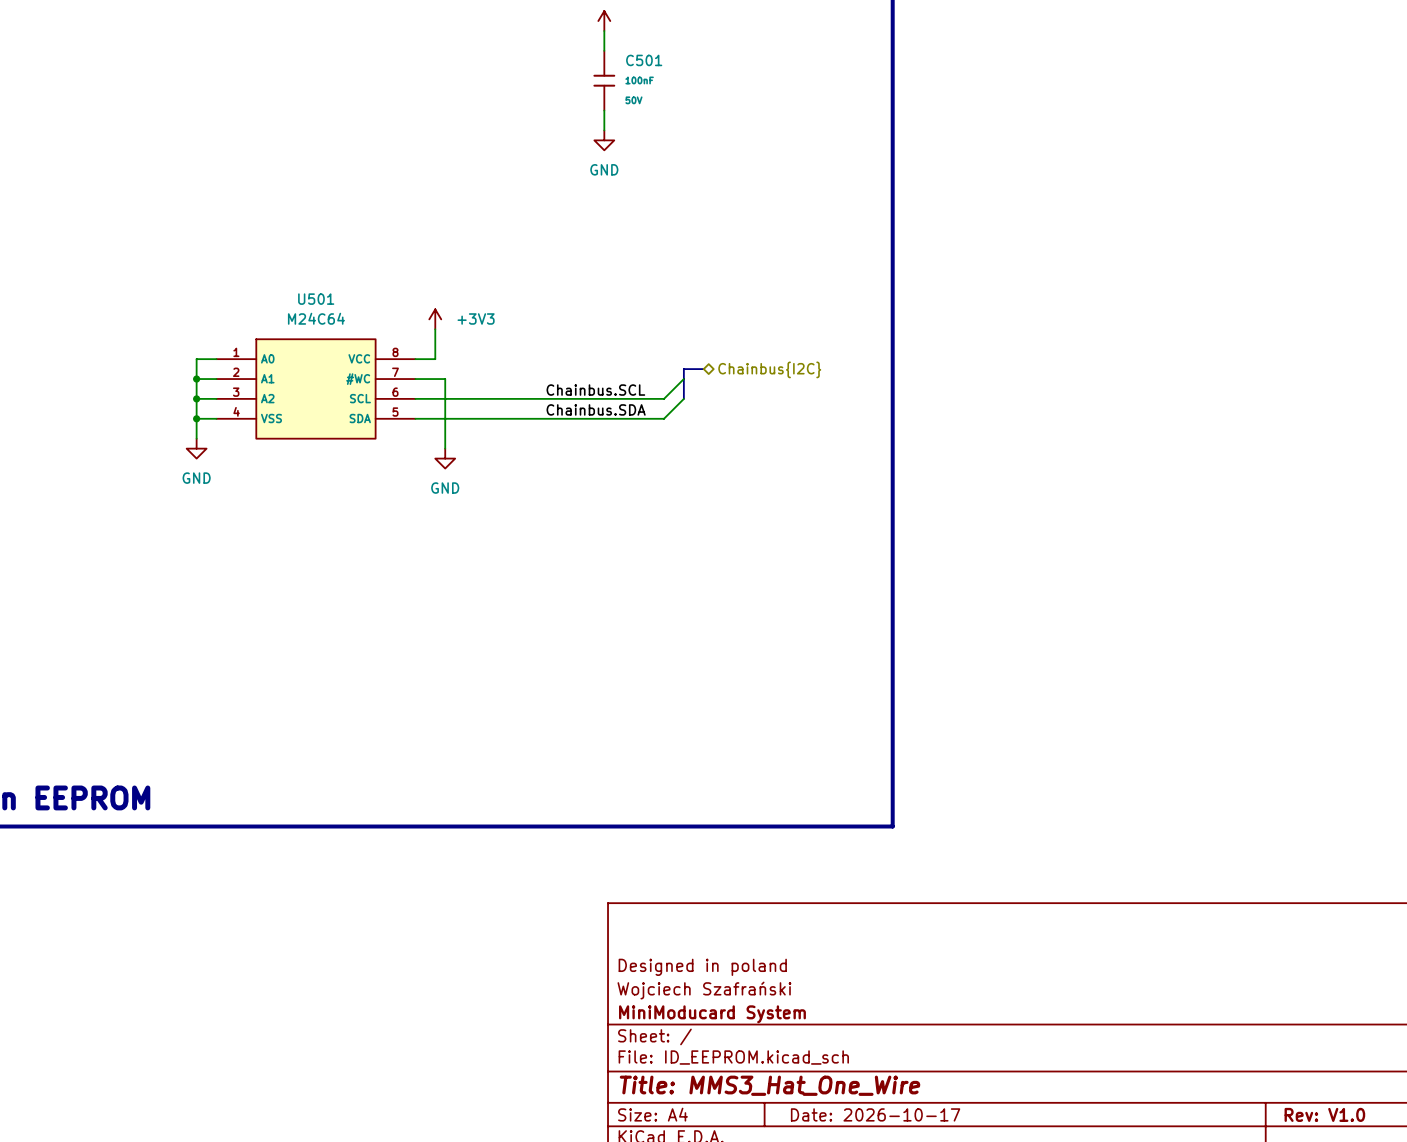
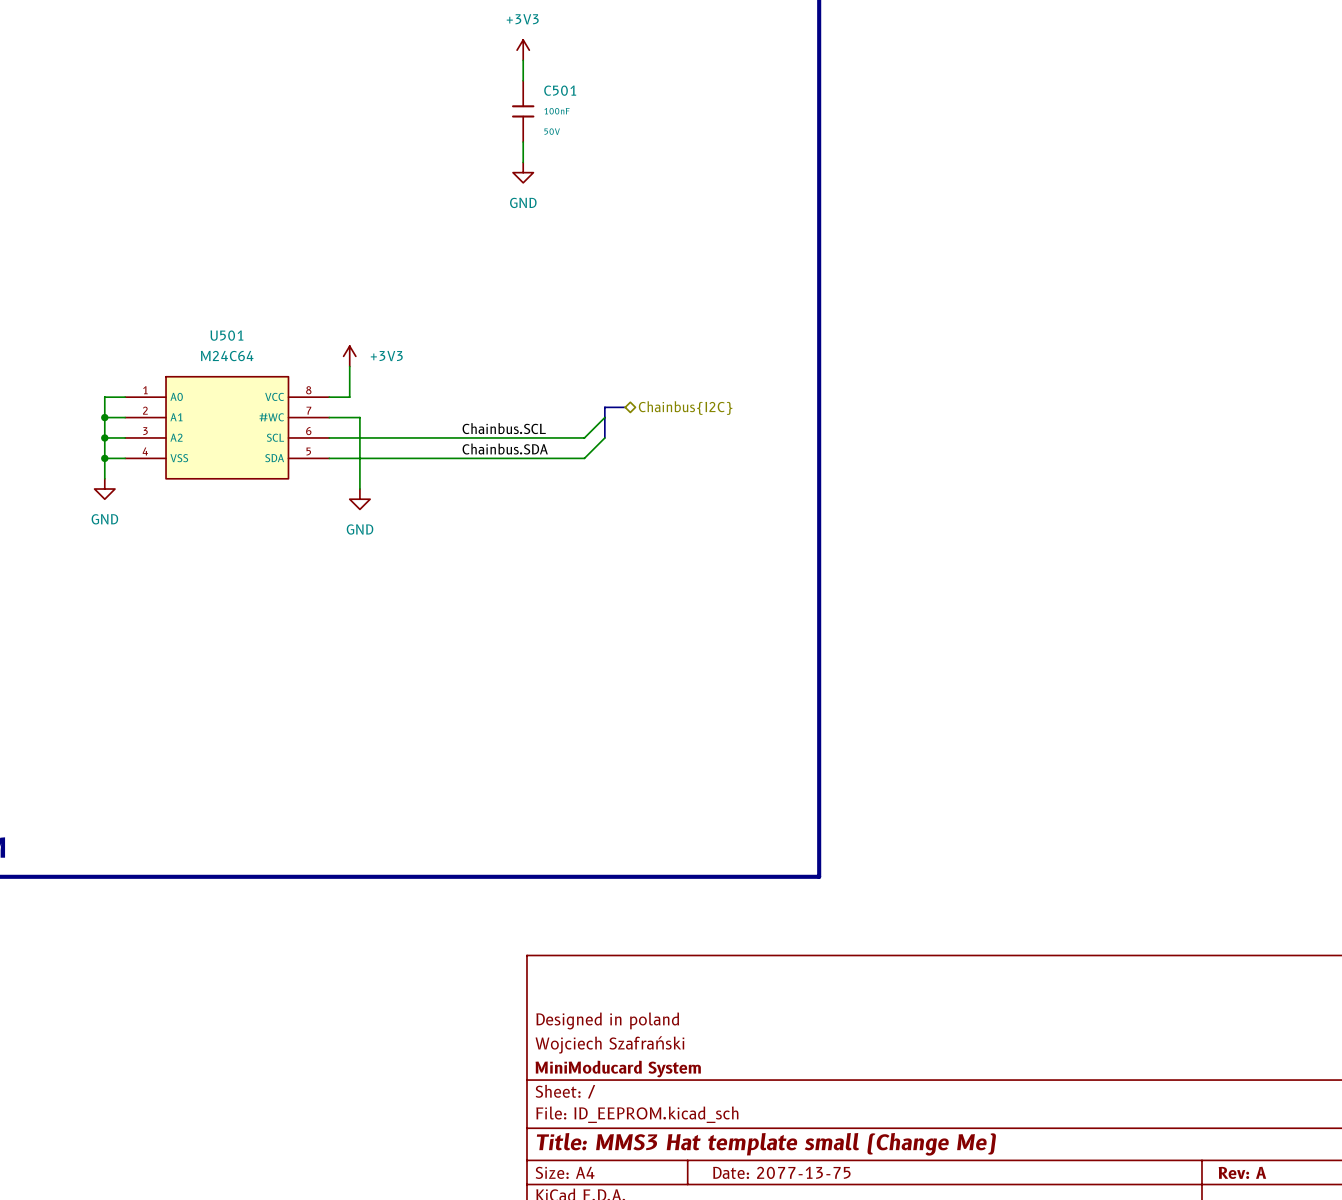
title block: Title: MMS3_Hat_One_Wire (770, 1085) -> Title: MMS3 Hat template small (Change Me) (766, 1144)
title block: Date: 2026-10-17 (875, 1114) -> Date: 2077-13-75 (781, 1172)
title block: Rev: V1.0 (1324, 1114) -> Rev: A (1242, 1172)

